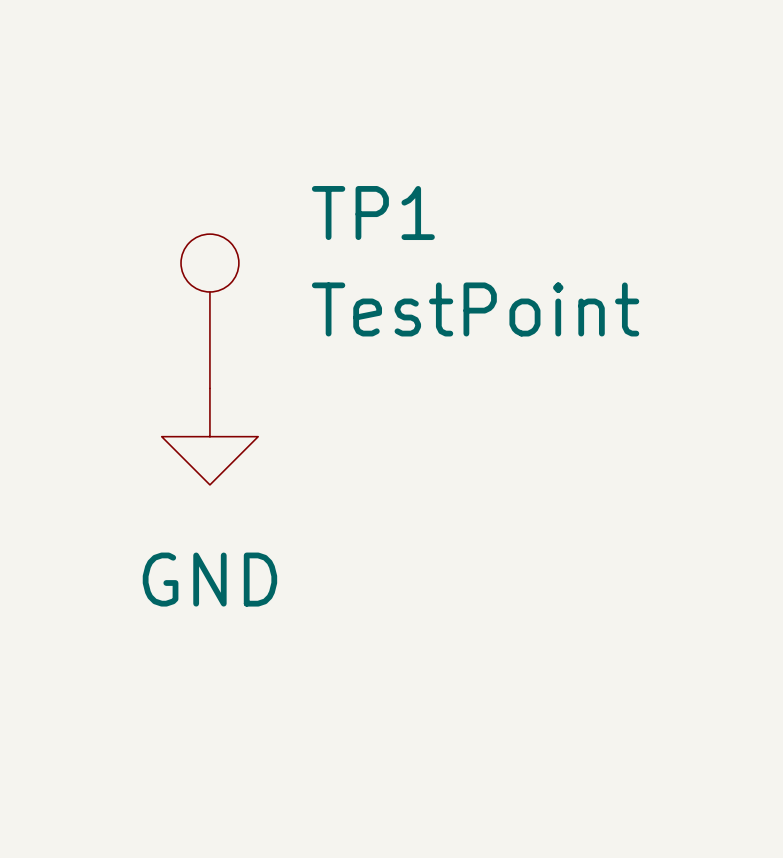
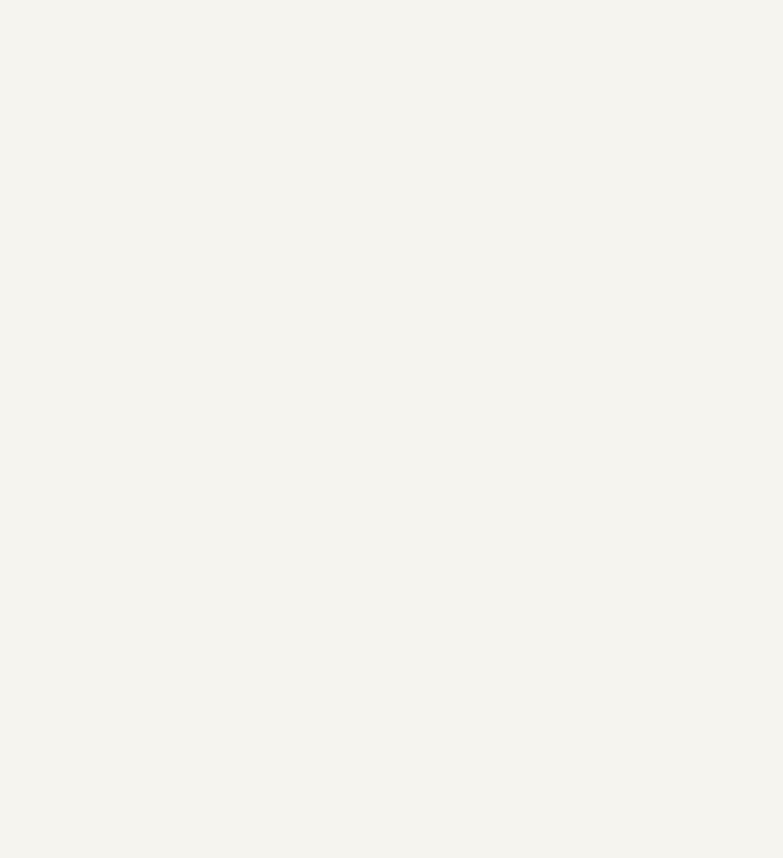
TP1: TestPoint (209, 311) -> none
power symbol: GND (209, 436) -> none

